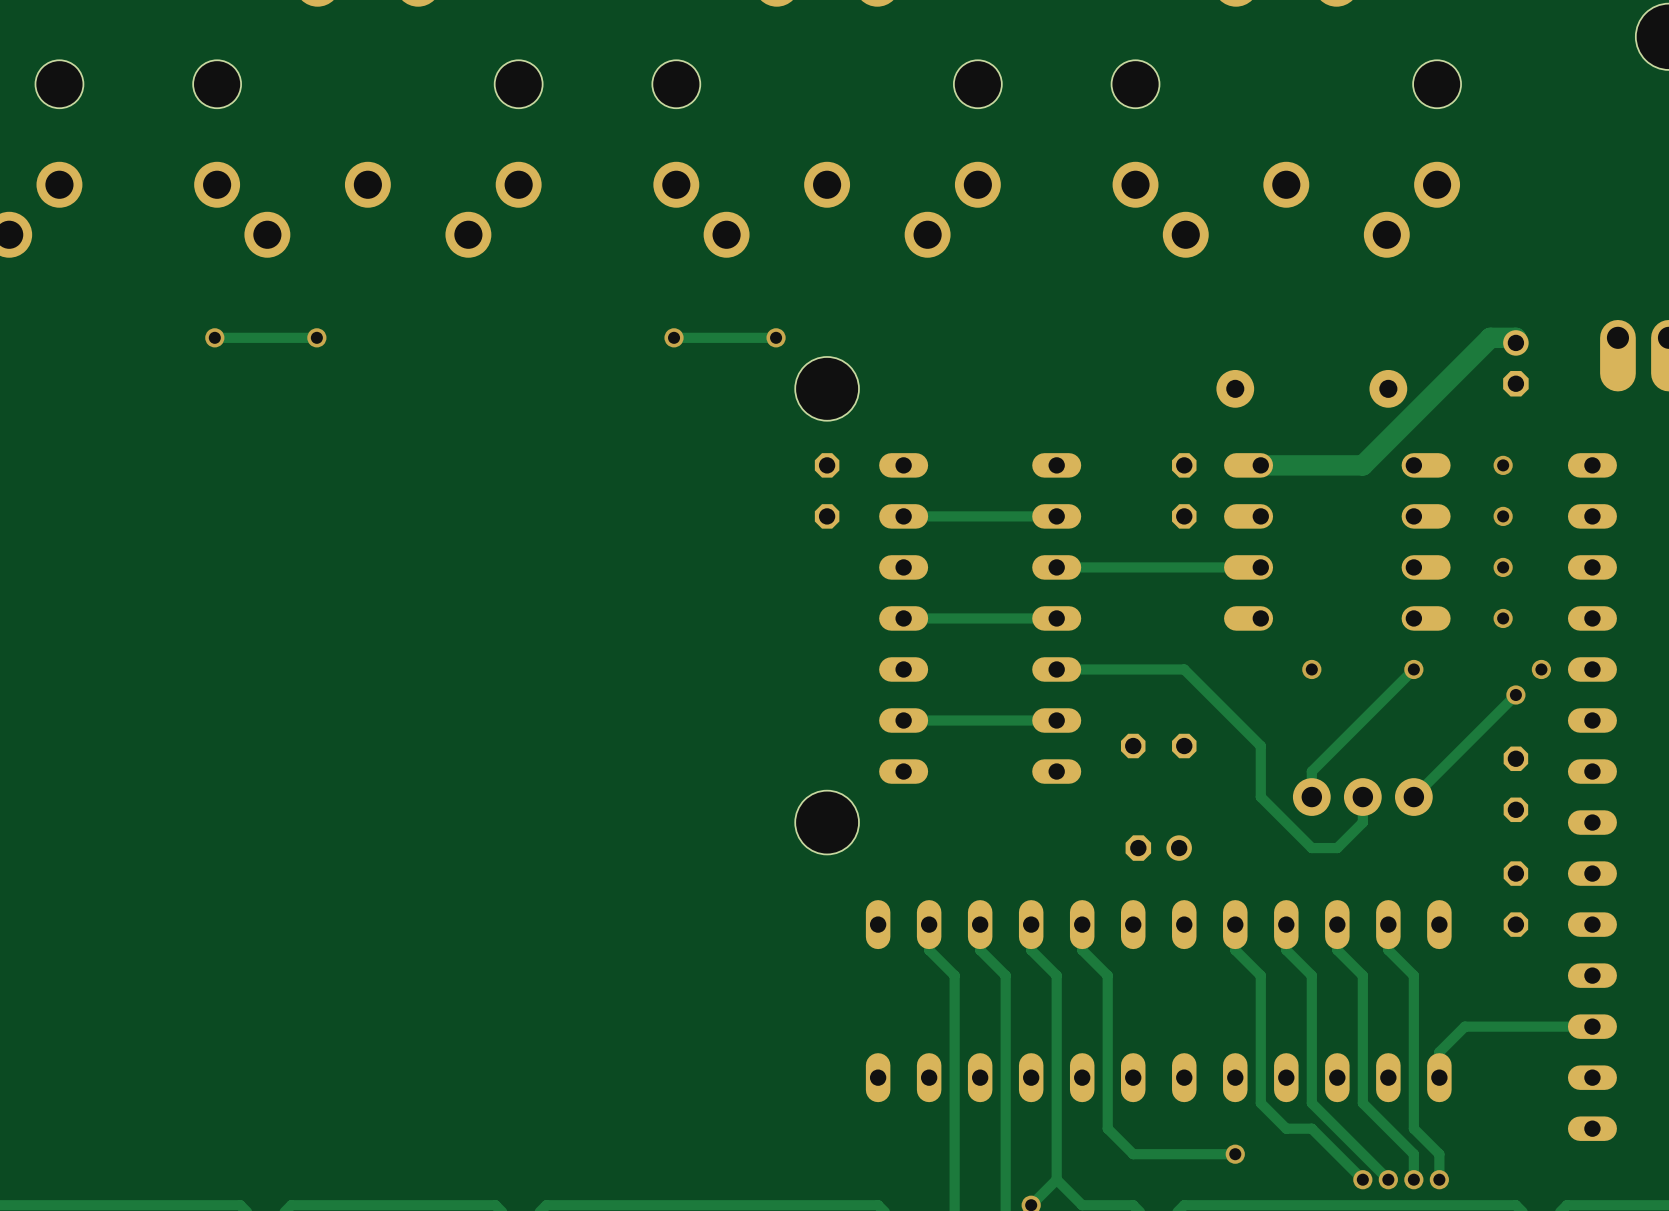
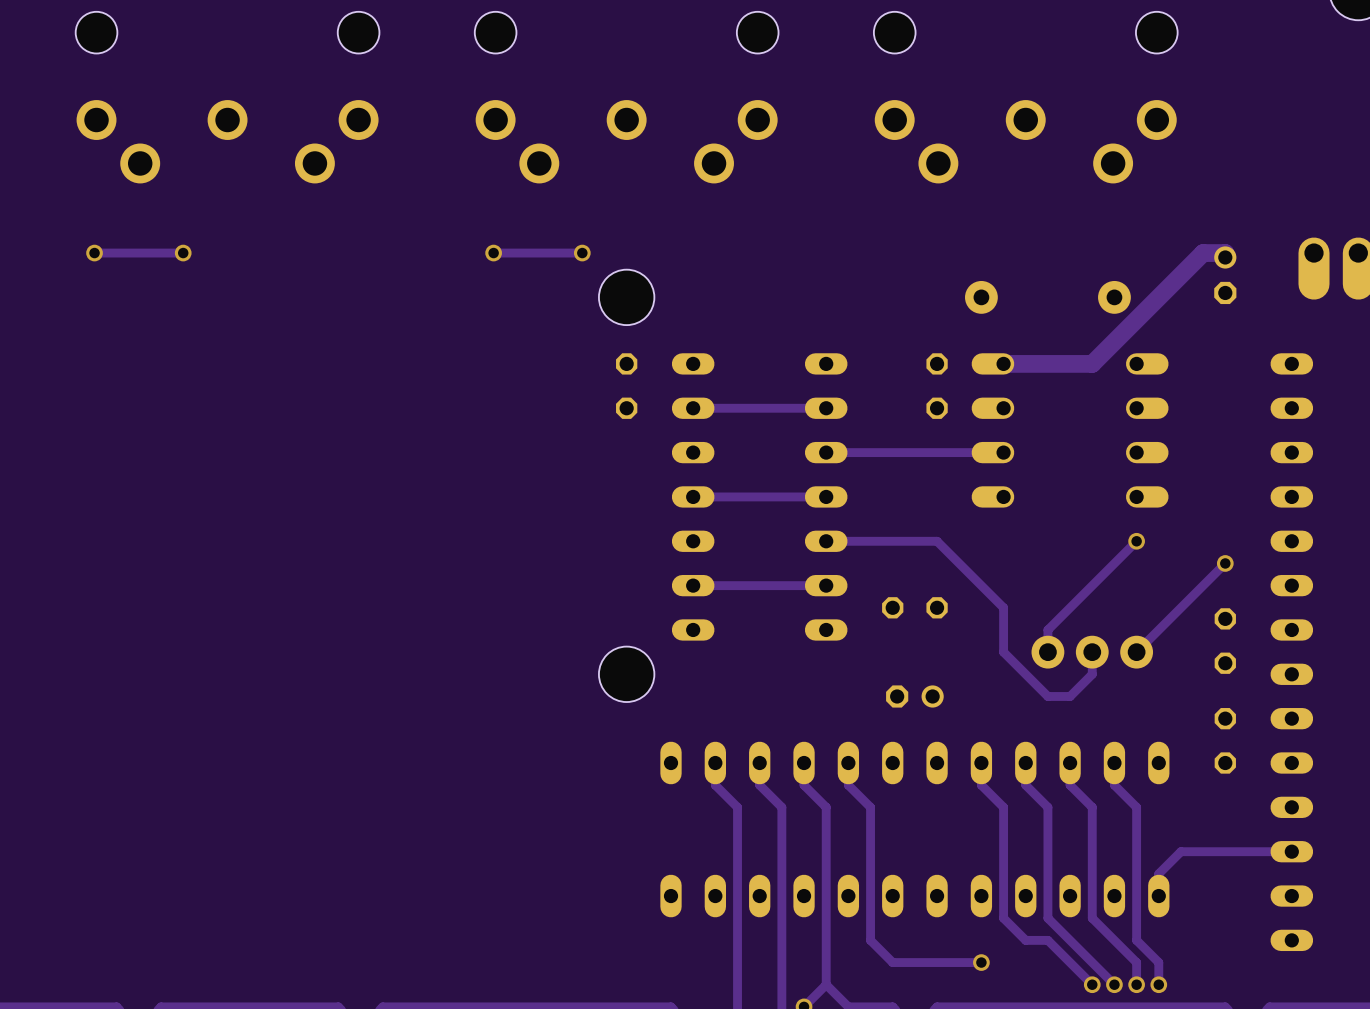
via: (1503, 465) -> none
via: (1503, 516) -> none
via: (1503, 567) -> none
via: (1503, 618) -> none
via: (1311, 669) -> none
via: (1541, 669) -> none

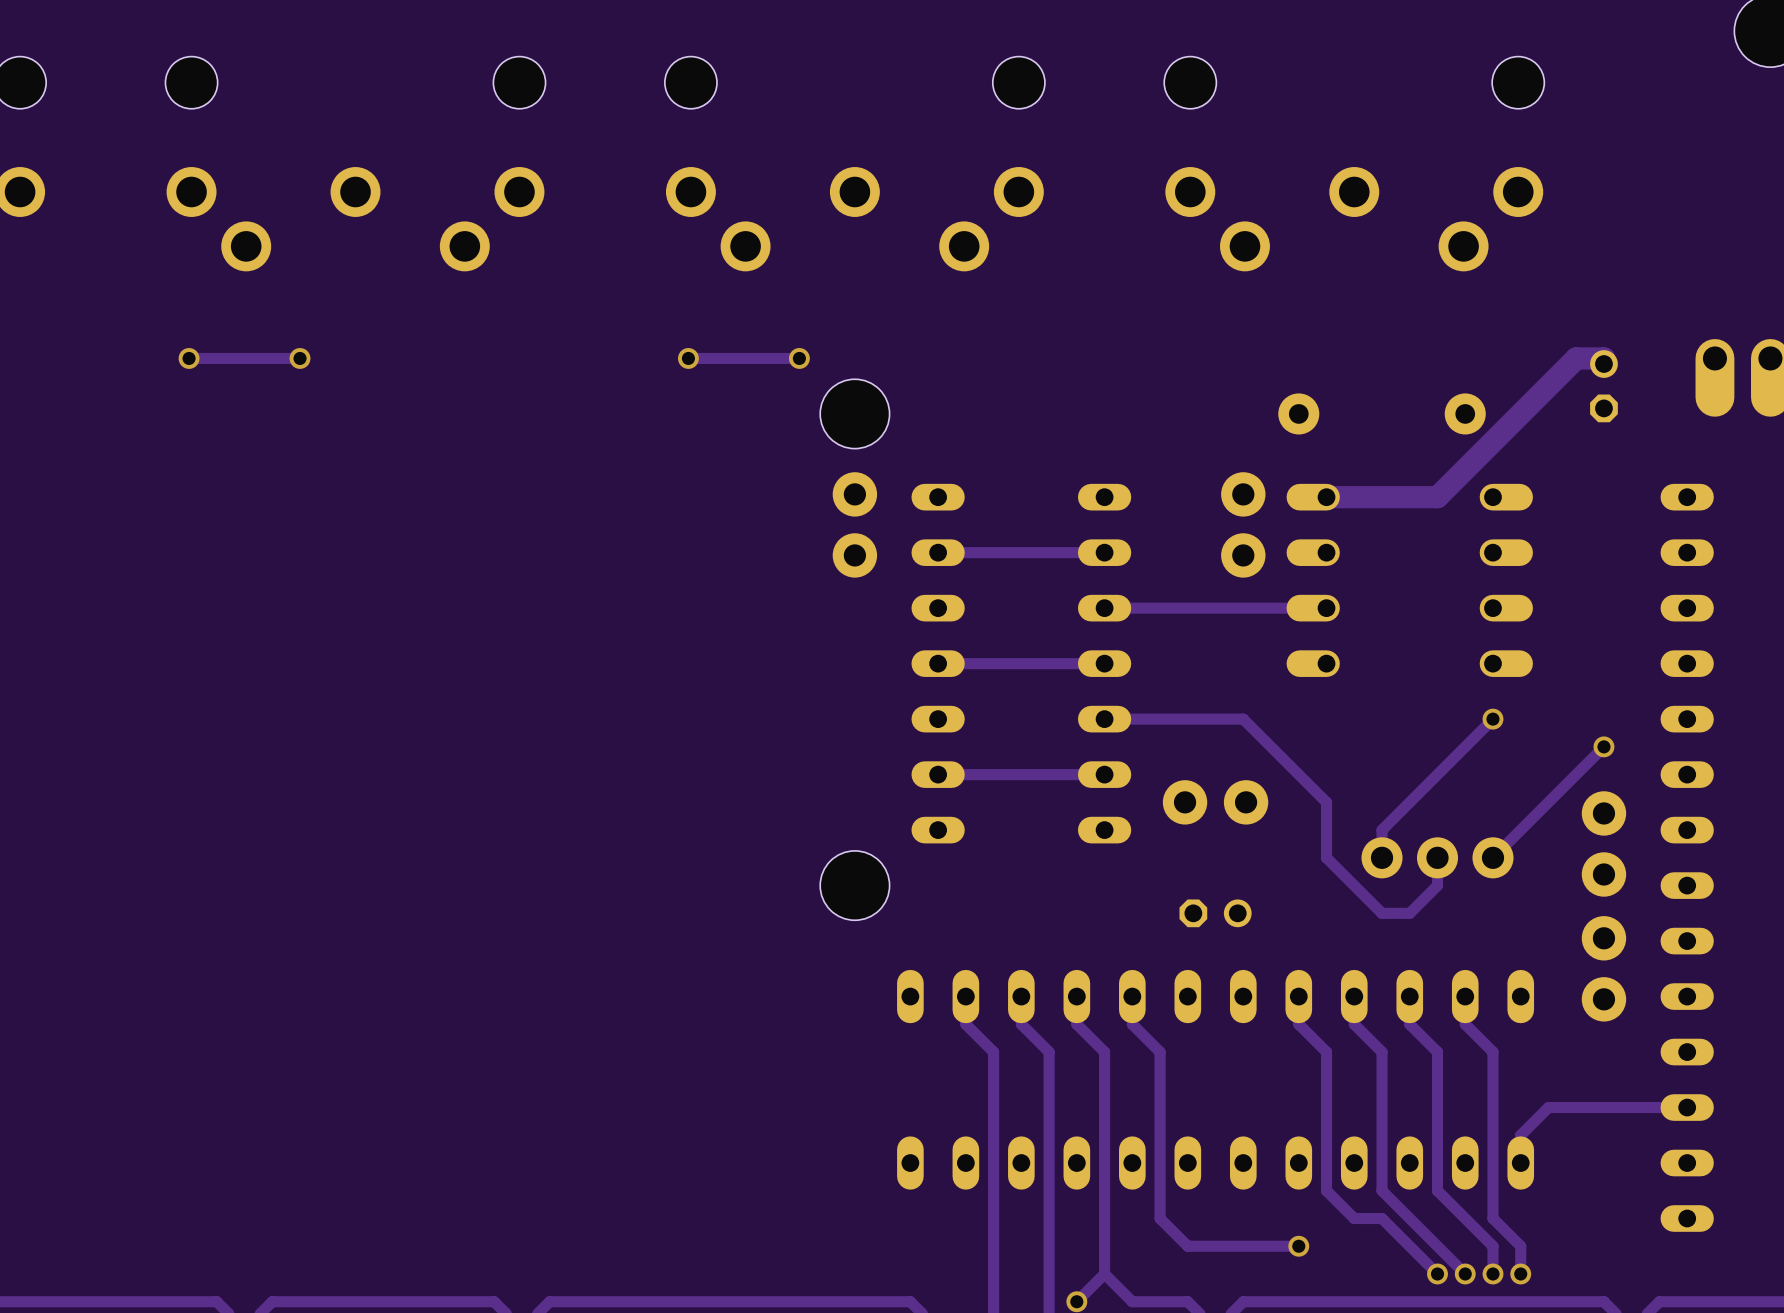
part footprint: [616, 353, 638, 419] -> [832, 472, 878, 578]
part footprint: [926, 353, 948, 419] -> [1221, 472, 1266, 578]
part footprint: [882, 597, 948, 619] -> [1162, 780, 1269, 825]
part footprint: [1214, 608, 1236, 674] -> [1581, 791, 1627, 897]
part footprint: [1214, 708, 1236, 774] -> [1581, 916, 1627, 1022]

